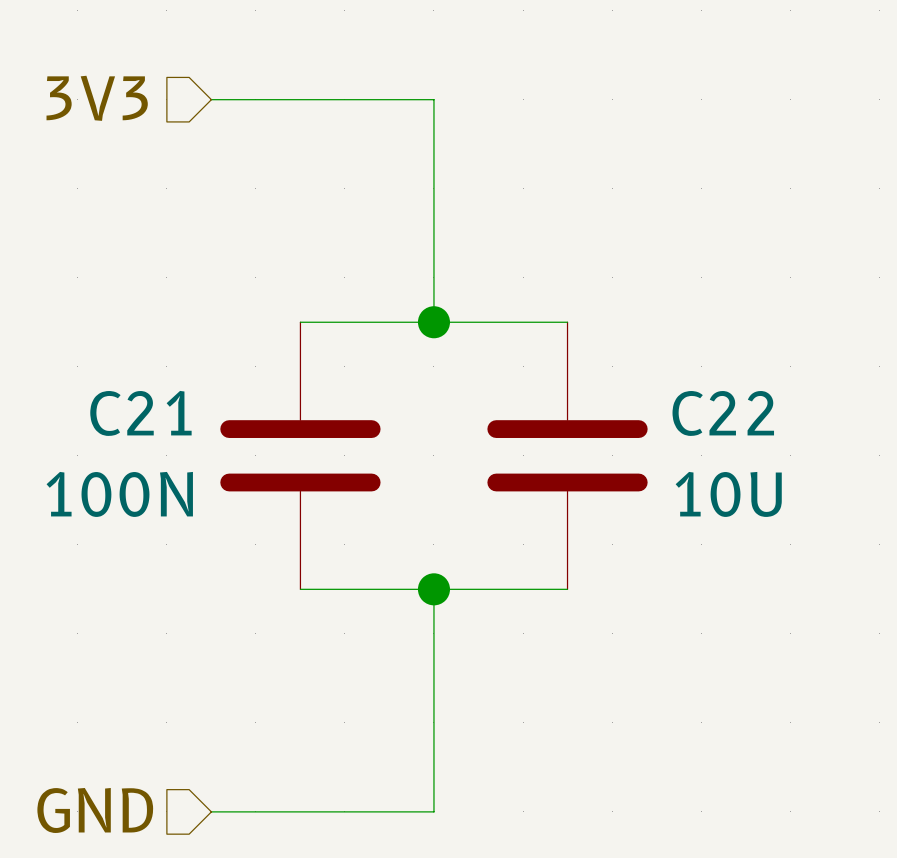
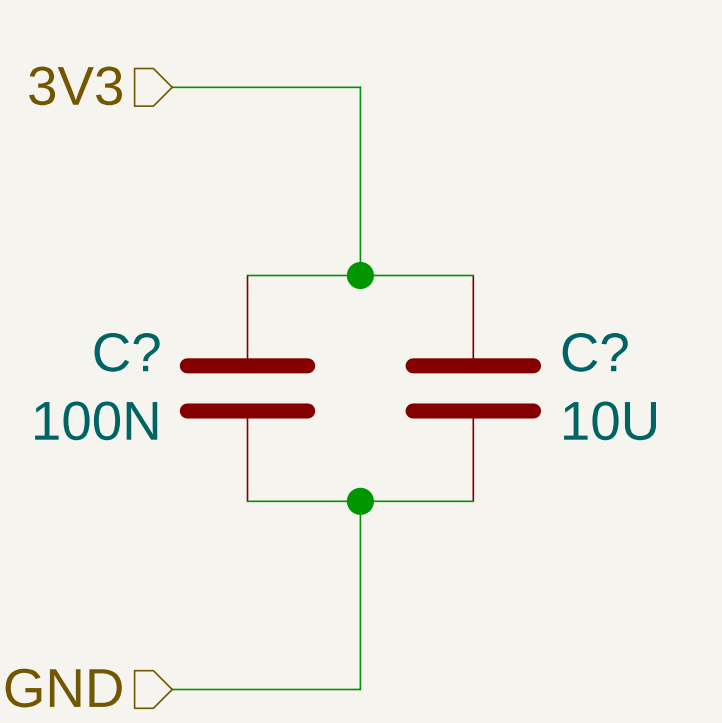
C21 name: C21 (140, 413) -> C? (127, 352)
C22 name: C22 (723, 413) -> C? (595, 352)

